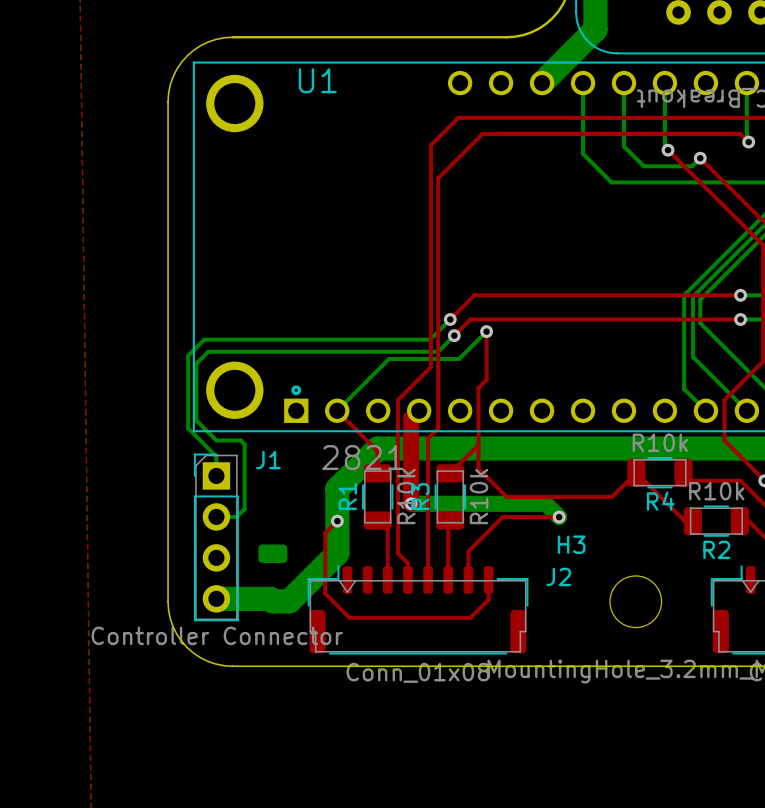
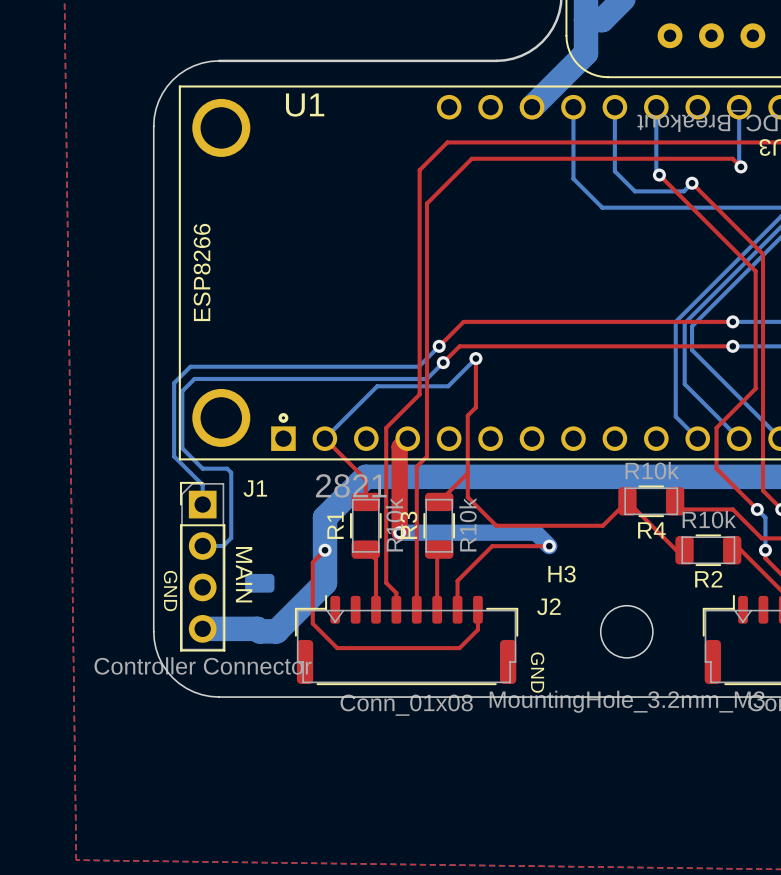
text: none -> ESP8266 (202, 272)
text: none -> MAIN (244, 574)
text: none -> GND (170, 591)
text: none -> GND (537, 672)

